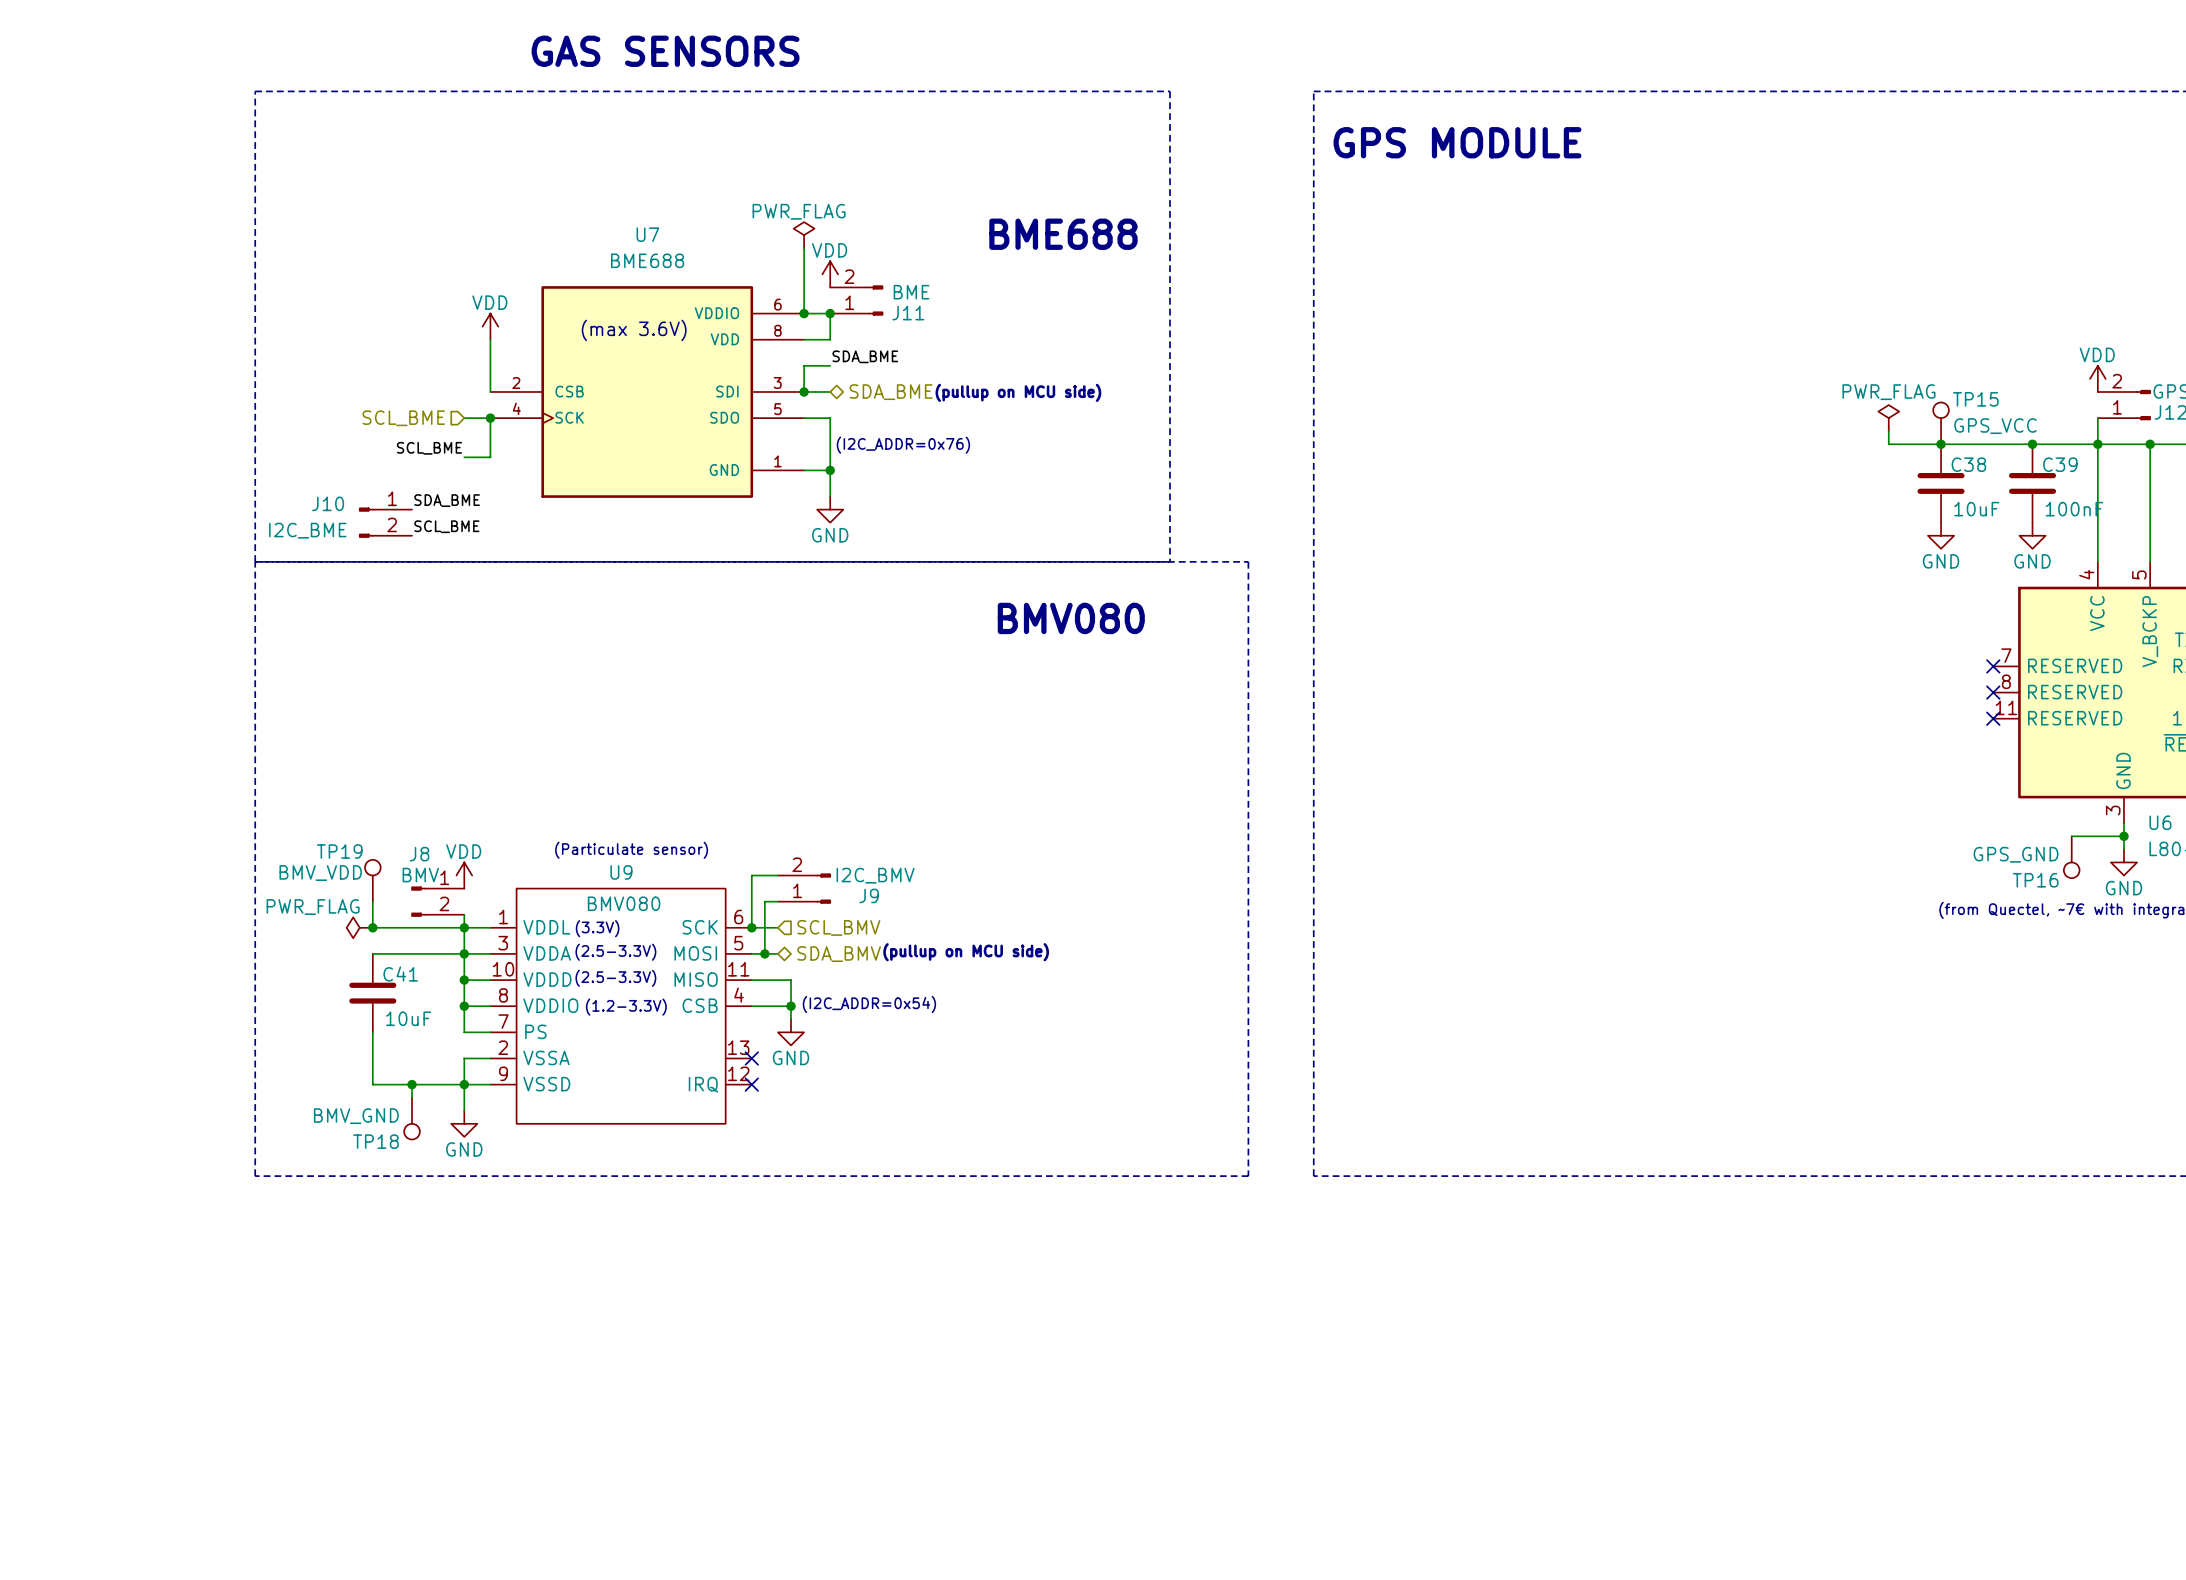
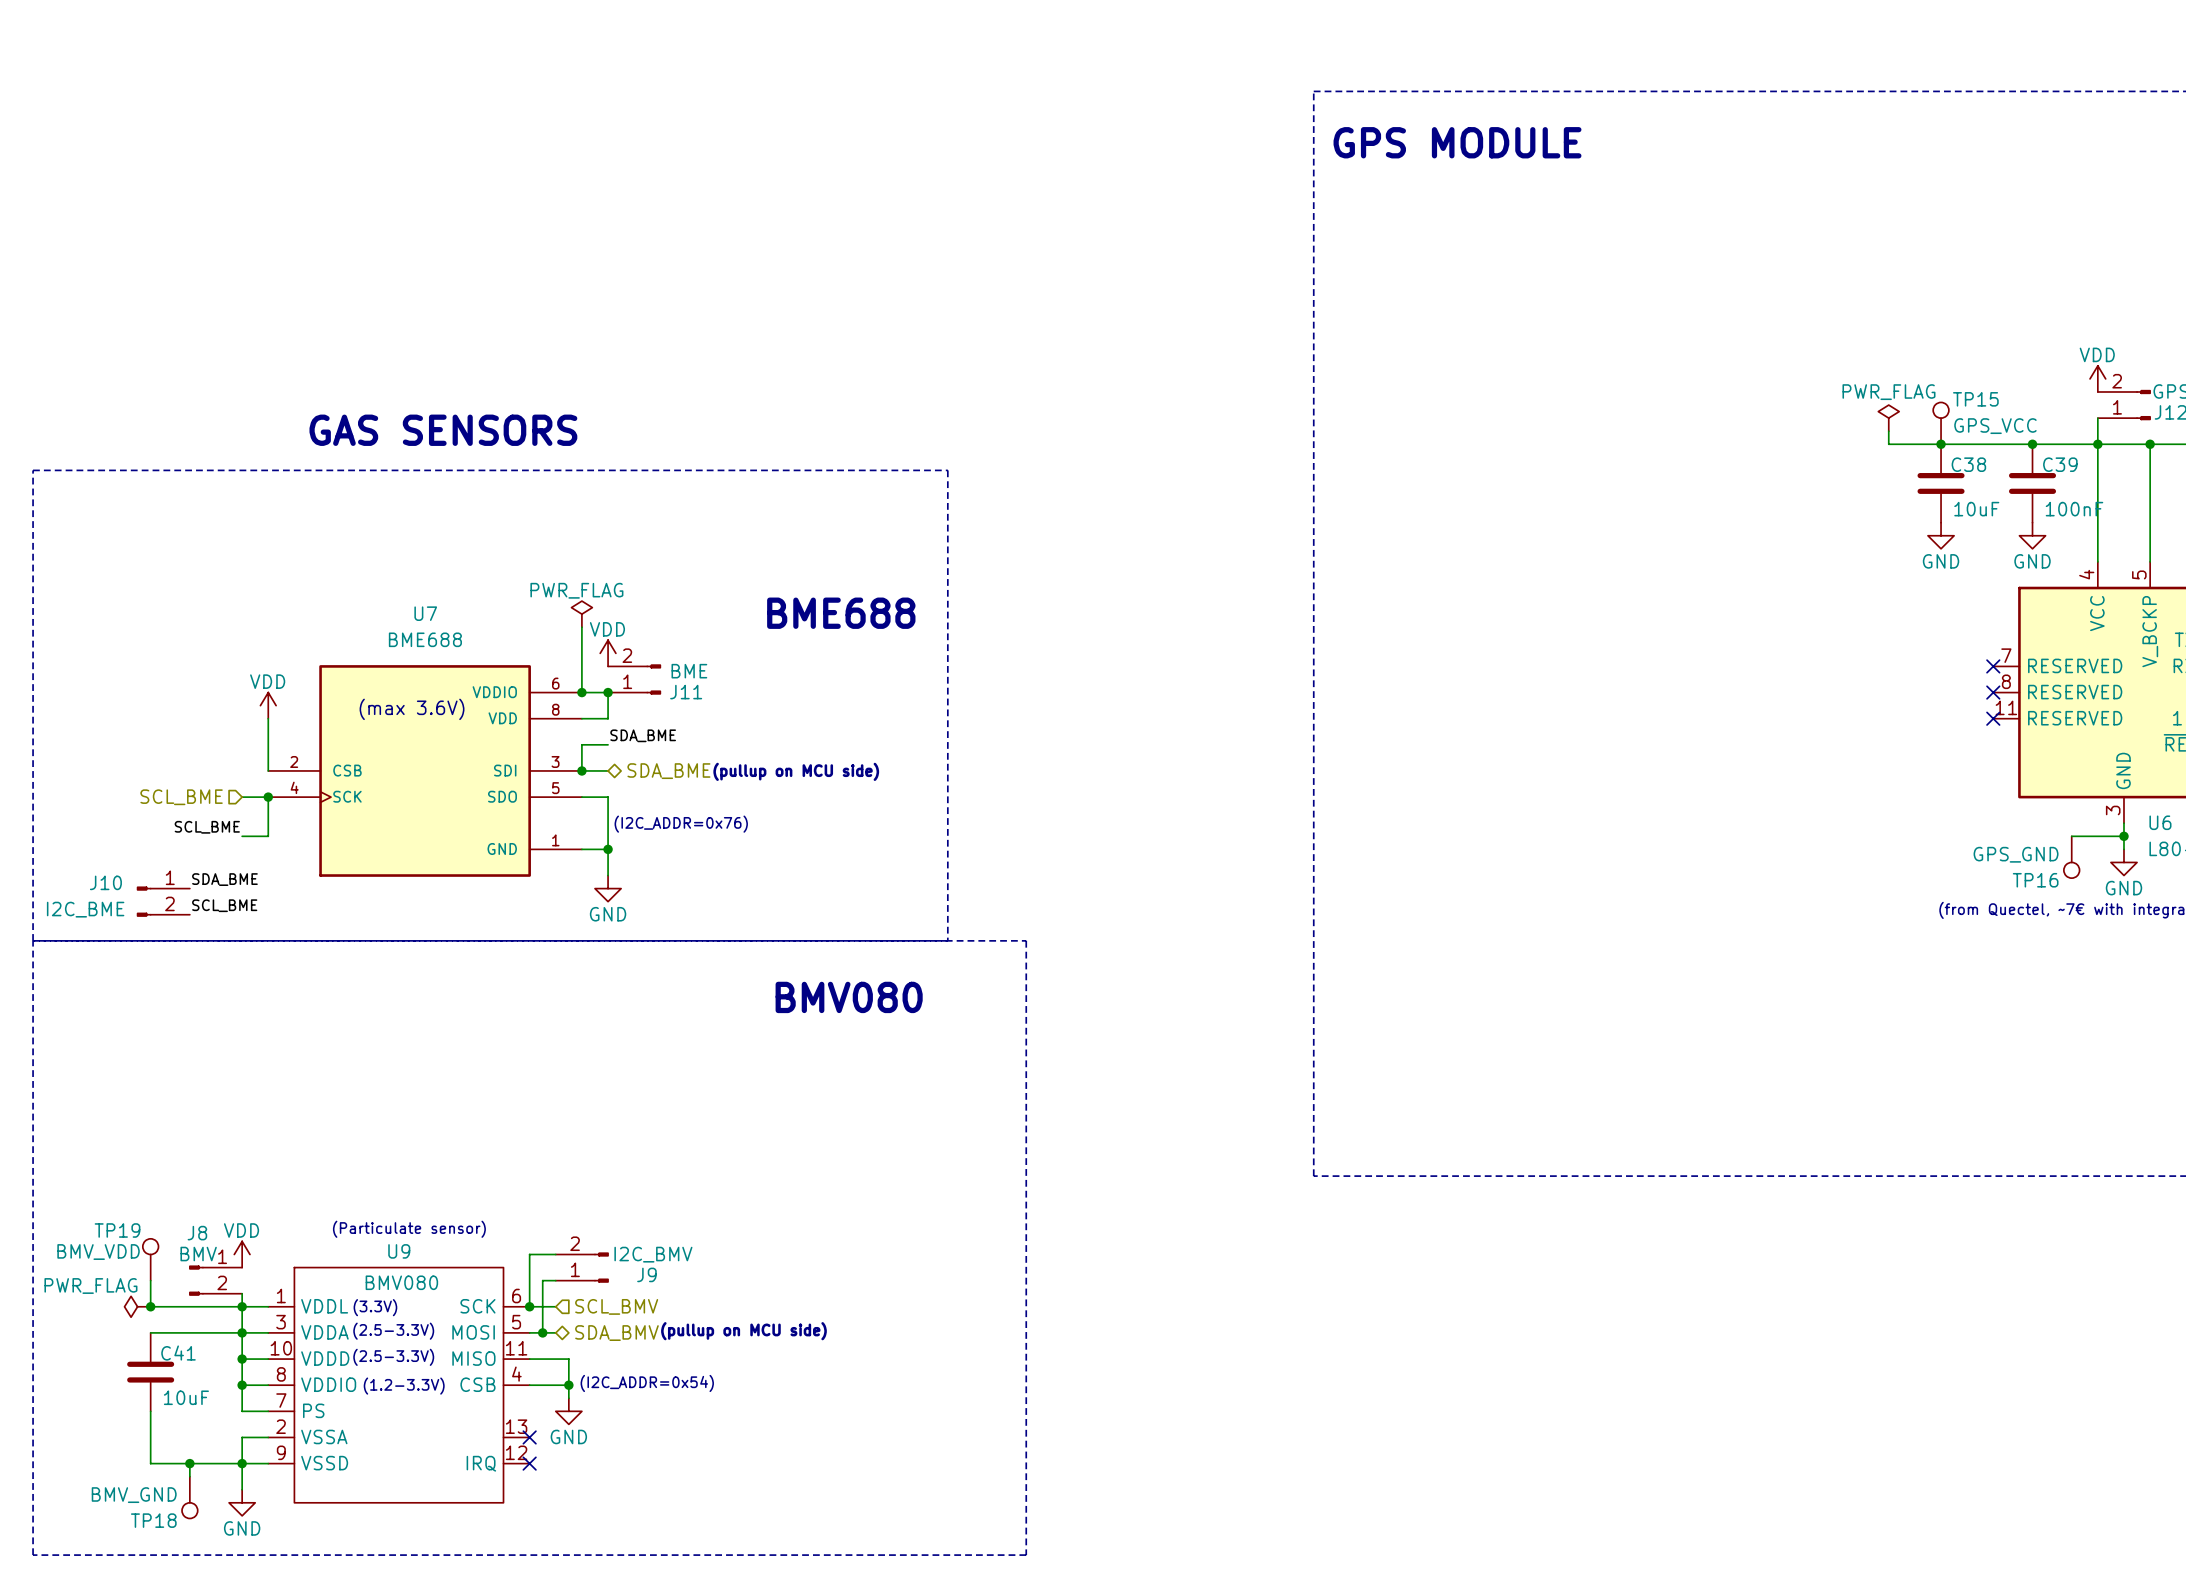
text: GAS SENSORS (665, 51) -> none
text: BME688 (1063, 234) -> none
power symbol: PWR_FLAG (804, 235) -> none
wire: (804, 248) (804, 313) (830, 313) (830, 339) (804, 339) -> none
power symbol: VDD (830, 274) -> none
J11 position: (856, 300) -> (634, 679)
junction: (804, 313) -> none
junction: (830, 313) -> none
power symbol: VDD (490, 326) -> none
text: (max 3.6V) (634, 330) -> none
wire: (490, 339) (490, 391) -> none
label: SDA_BME (865, 356) -> none
wire: (830, 365) (804, 365) (804, 391) (830, 391) -> none
U7 position: (647, 391) -> (425, 770)
junction: (804, 391) -> none
hierarchical label: SDA_BME (891, 392) -> none
text: (pullup on MCU side) (1018, 392) -> none
hierarchical label: SCL_BME (403, 418) -> none
wire: (464, 418) (490, 418) (490, 457) (464, 457) -> none
junction: (490, 418) -> none
wire: (804, 418) (830, 418) (830, 496) -> none
text: none -> GAS SENSORS (443, 430)
text: (I2C_ADDR=0x76) (903, 445) -> none
label: SCL_BME (429, 448) -> none
junction: (830, 470) -> none
label: SDA_BME (447, 500) -> none
power symbol: GND (830, 509) -> none
J10 position: (385, 522) -> (163, 901)
label: SCL_BME (446, 526) -> none
line: (255, 561) (1248, 561) (1248, 1176) (255, 1176) (255, 91) (1169, 91) (1169, 561) -> none
text: none -> BME688 (841, 613)
power symbol: none -> PWR_FLAG (581, 614)
text: BMV080 (1071, 618) -> none
wire: none -> (581, 627) (581, 692) (608, 692) (608, 718) (581, 718)
power symbol: none -> VDD (608, 653)
junction: none -> (581, 692)
junction: none -> (608, 692)
power symbol: none -> VDD (268, 705)
text: none -> (max 3.6V) (412, 709)
wire: none -> (268, 718) (268, 770)
label: none -> SDA_BME (643, 735)
wire: none -> (608, 744) (581, 744) (581, 770) (608, 770)
junction: none -> (581, 770)
hierarchical label: none -> SDA_BME (668, 771)
text: none -> (pullup on MCU side) (796, 771)
hierarchical label: none -> SCL_BME (181, 797)
wire: none -> (242, 797) (268, 797) (268, 836) (242, 836)
junction: none -> (268, 797)
wire: none -> (581, 797) (608, 797) (608, 875)
text: none -> (I2C_ADDR=0x76) (681, 824)
label: none -> SCL_BME (207, 827)
junction: none -> (608, 849)
text: (Particulate sensor) (631, 850) -> none
power symbol: VDD (464, 875) -> none
wire: (777, 875) (751, 875) (751, 927) (777, 927) -> none
label: none -> SDA_BME (224, 879)
TP19 position: (372, 880) -> (150, 1259)
power symbol: none -> GND (608, 888)
J9 position: (804, 888) -> (582, 1267)
wire: (372, 901) (372, 927) (490, 927) -> none
J8 position: (437, 901) -> (215, 1280)
wire: (777, 901) (764, 901) (764, 953) -> none
label: none -> SCL_BME (224, 905)
wire: (464, 914) (464, 1032) (490, 1032) -> none
power symbol: PWR_FLAG (359, 927) -> none
junction: (372, 927) -> none
junction: (464, 927) -> none
junction: (751, 927) -> none
hierarchical label: SCL_BMV (838, 927) -> none
text: (3.3V) (597, 928) -> none
line: none -> (33, 940) (1026, 940) (1026, 1555) (33, 1555) (33, 470) (947, 470) (947, 940)
text: (2.5-3.3V) (615, 952) -> none
text: (pullup on MCU side) (966, 952) -> none
wire: (372, 953) (490, 953) -> none
junction: (464, 953) -> none
wire: (751, 953) (777, 953) -> none
junction: (764, 953) -> none
hierarchical label: SDA_BMV (839, 954) -> none
text: (2.5-3.3V) (615, 978) -> none
wire: (464, 980) (490, 980) -> (581, 849) (608, 849)
junction: (464, 980) -> none
wire: (751, 980) (791, 980) (791, 1019) -> none
C41 position: (372, 993) -> (150, 1372)
text: none -> BMV080 (849, 997)
text: (I2C_ADDR=0x54) (869, 1004) -> none
wire: (464, 1006) (490, 1006) -> none
junction: (464, 1006) -> none
U9 position: (621, 1006) -> (398, 1385)
wire: (751, 1006) (791, 1006) -> none
junction: (791, 1006) -> none
text: (1.2-3.3V) (626, 1007) -> none
wire: (372, 1032) (372, 1084) (490, 1084) -> none
power symbol: GND (791, 1032) -> none
wire: (490, 1058) (464, 1058) (464, 1110) -> none
no-connect mark: (751, 1058) -> none
wire: (412, 1084) (412, 1097) -> none
junction: (412, 1084) -> none
junction: (464, 1084) -> none
no-connect mark: (751, 1084) -> none
TP18 position: (412, 1118) -> (189, 1497)
power symbol: GND (464, 1123) -> none
text: none -> (Particulate sensor) (409, 1229)
power symbol: none -> VDD (242, 1254)
wire: none -> (555, 1254) (529, 1254) (529, 1306) (555, 1306)
wire: none -> (150, 1280) (150, 1306) (268, 1306)
wire: none -> (555, 1280) (542, 1280) (542, 1332)
wire: none -> (242, 1293) (242, 1411) (268, 1411)
power symbol: none -> PWR_FLAG (137, 1306)
junction: none -> (150, 1306)
junction: none -> (242, 1306)
junction: none -> (529, 1306)
hierarchical label: none -> SCL_BMV (616, 1306)
text: none -> (3.3V) (375, 1307)
text: none -> (2.5-3.3V) (393, 1331)
text: none -> (pullup on MCU side) (743, 1331)
wire: none -> (150, 1332) (268, 1332)
junction: none -> (242, 1332)
wire: none -> (529, 1332) (555, 1332)
junction: none -> (542, 1332)
hierarchical label: none -> SDA_BMV (616, 1333)
text: none -> (2.5-3.3V) (393, 1357)
wire: none -> (242, 1359) (268, 1359)
junction: none -> (242, 1359)
wire: none -> (529, 1359) (568, 1359) (568, 1398)
text: none -> (I2C_ADDR=0x54) (647, 1383)
wire: none -> (242, 1385) (268, 1385)
junction: none -> (242, 1385)
wire: none -> (529, 1385) (568, 1385)
junction: none -> (568, 1385)
text: none -> (1.2-3.3V) (404, 1386)
wire: none -> (150, 1411) (150, 1463) (268, 1463)
power symbol: none -> GND (568, 1411)
wire: none -> (268, 1437) (242, 1437) (242, 1489)
no-connect mark: none -> (529, 1437)
wire: none -> (189, 1463) (189, 1476)
junction: none -> (189, 1463)
junction: none -> (242, 1463)
no-connect mark: none -> (529, 1463)
power symbol: none -> GND (242, 1502)

